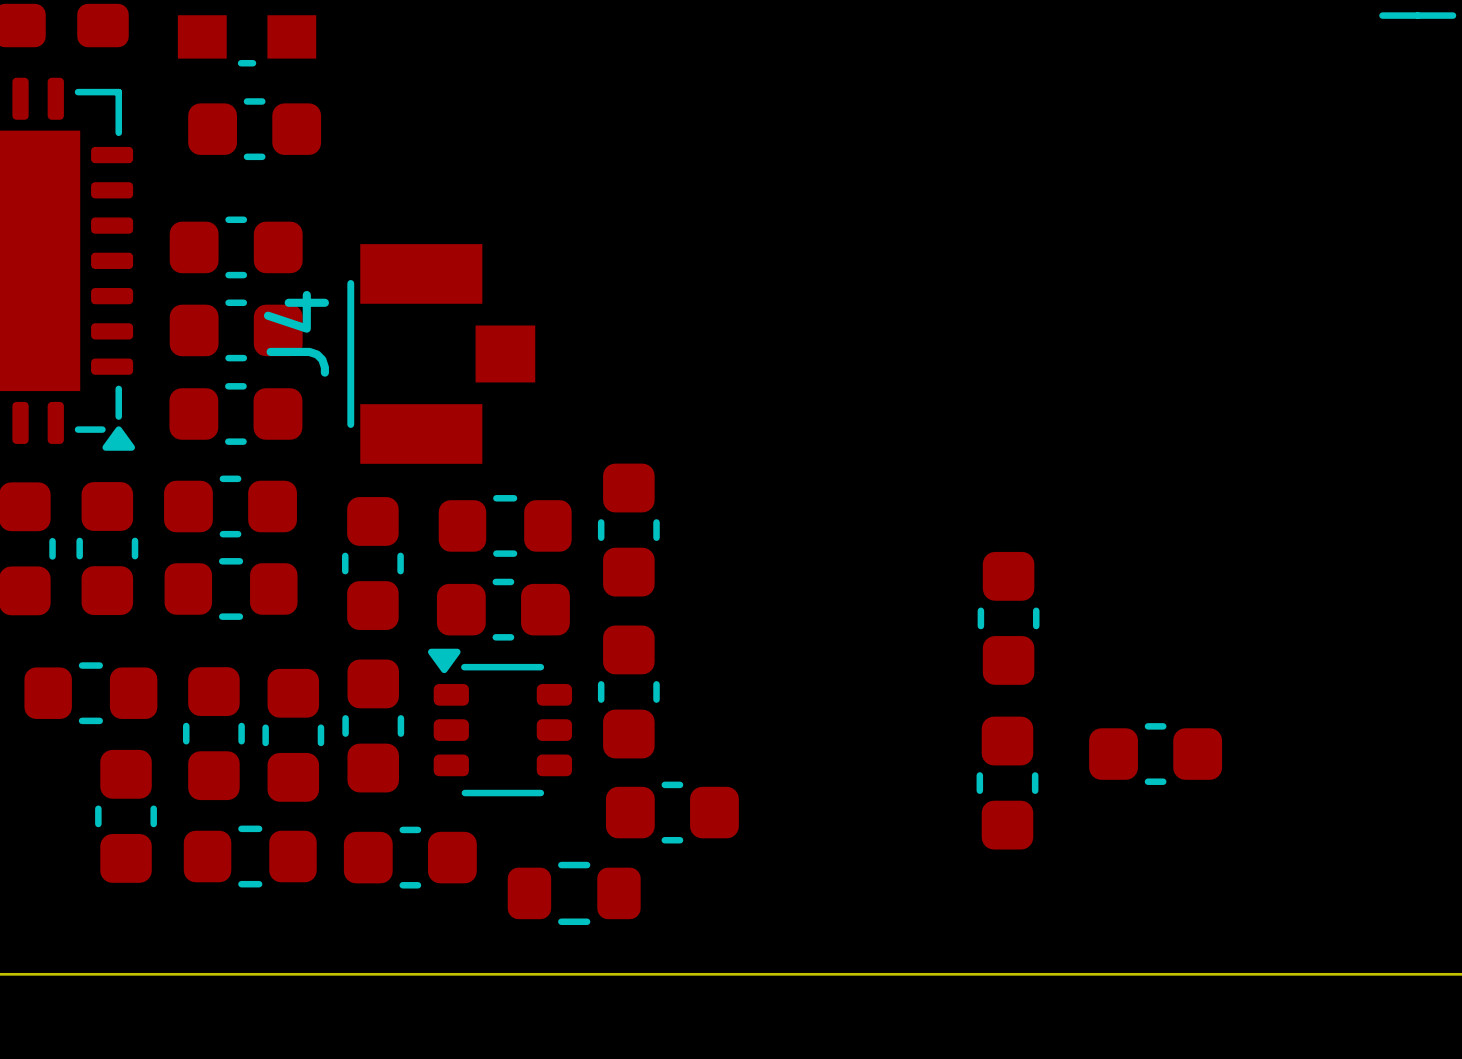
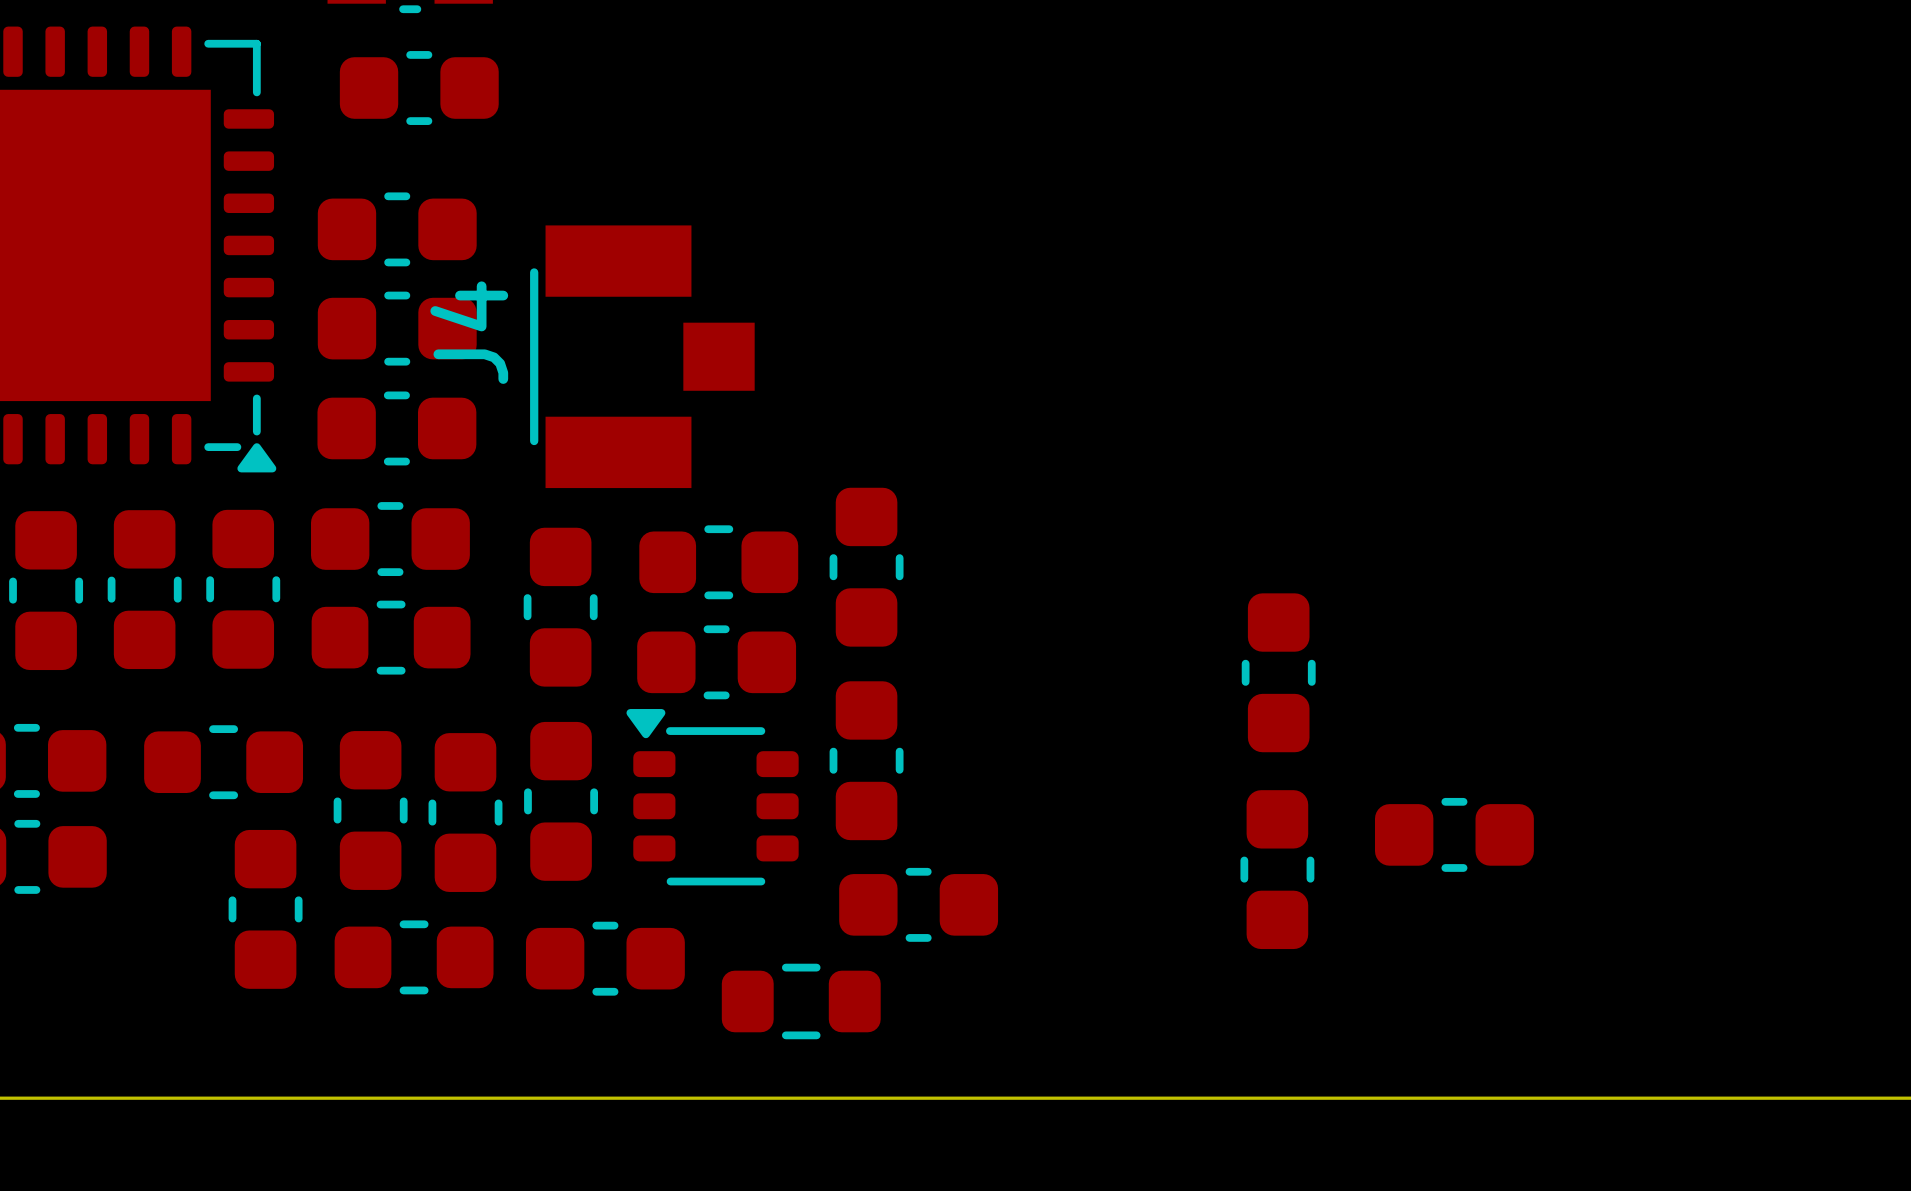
part position: (1008, 618) -> (1278, 672)
part position: (1155, 754) -> (1454, 834)
part position: (1007, 783) -> (1277, 869)

